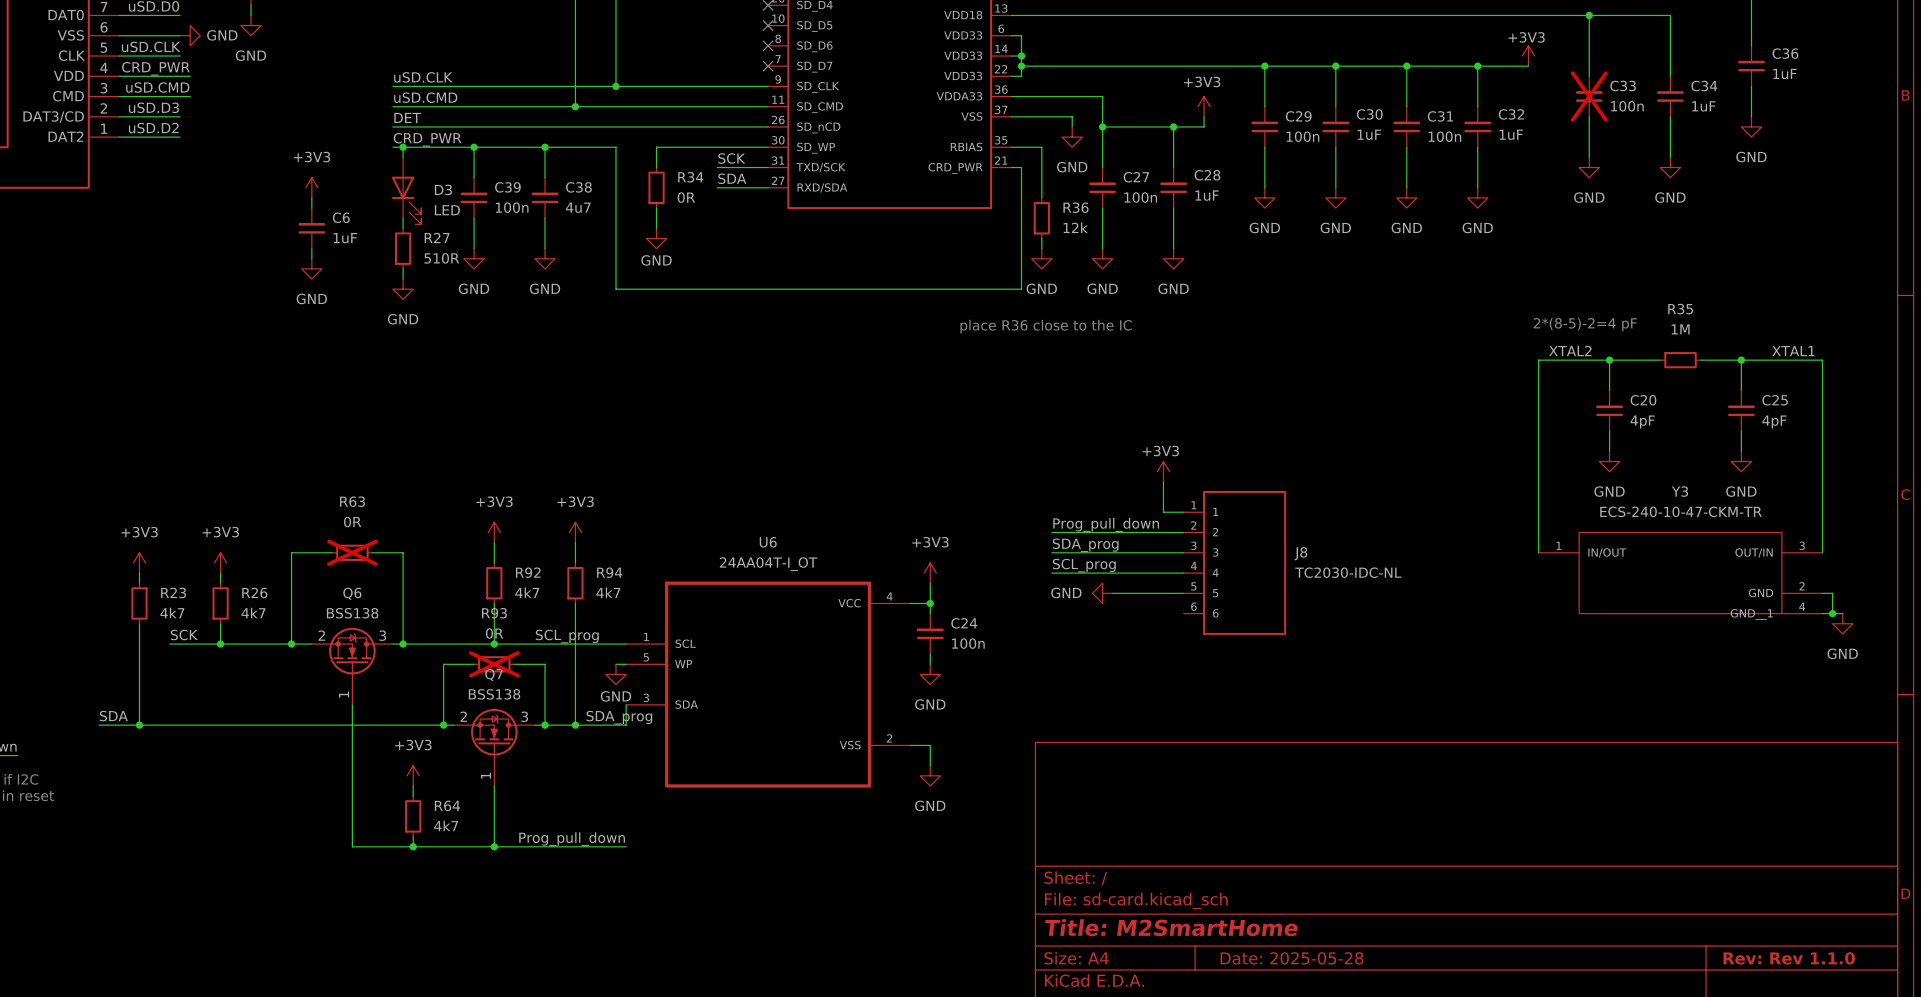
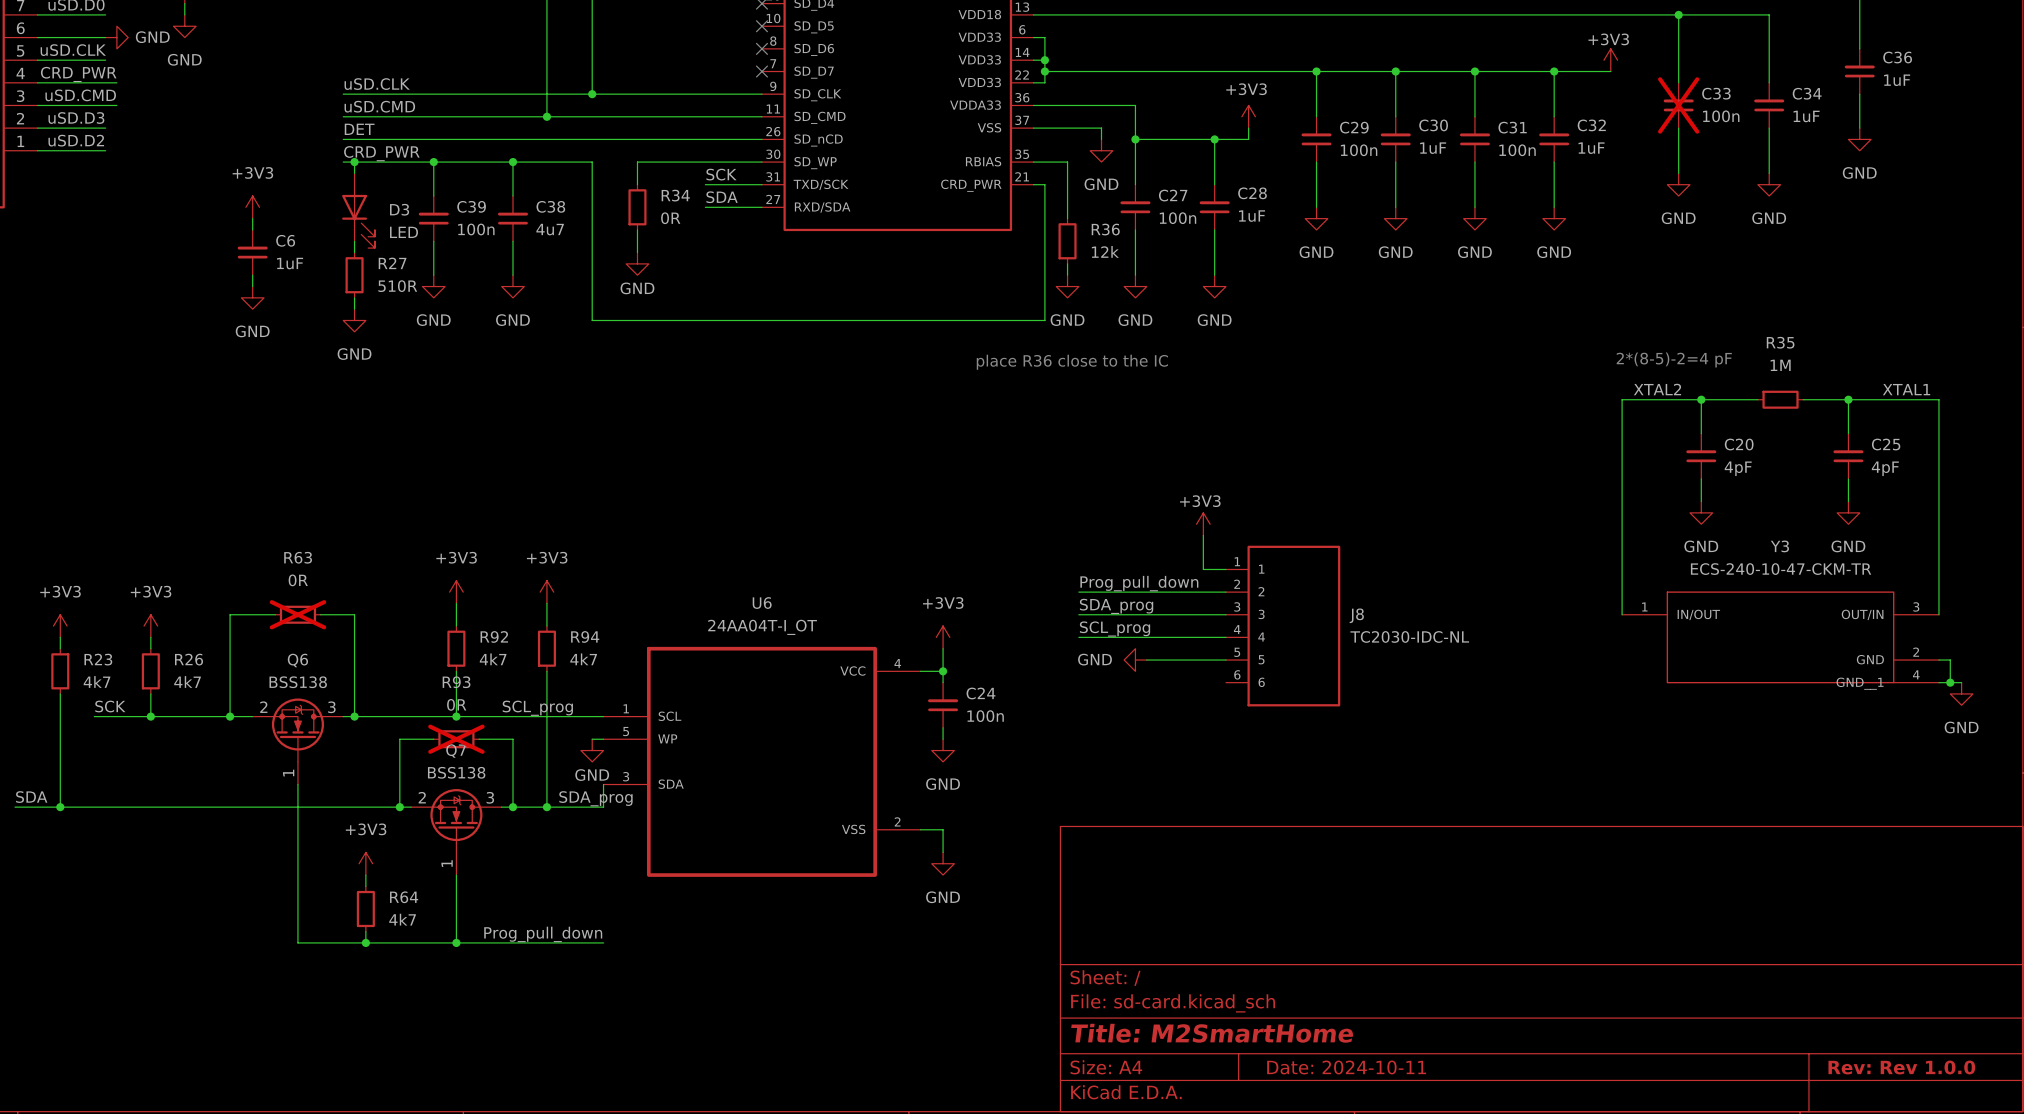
title block: Date: 2025-05-28 (1292, 958) -> Date: 2024-10-11 (1346, 1067)
title block: Rev: Rev 1.1.0 (1789, 958) -> Rev: Rev 1.0.0 (1901, 1067)

